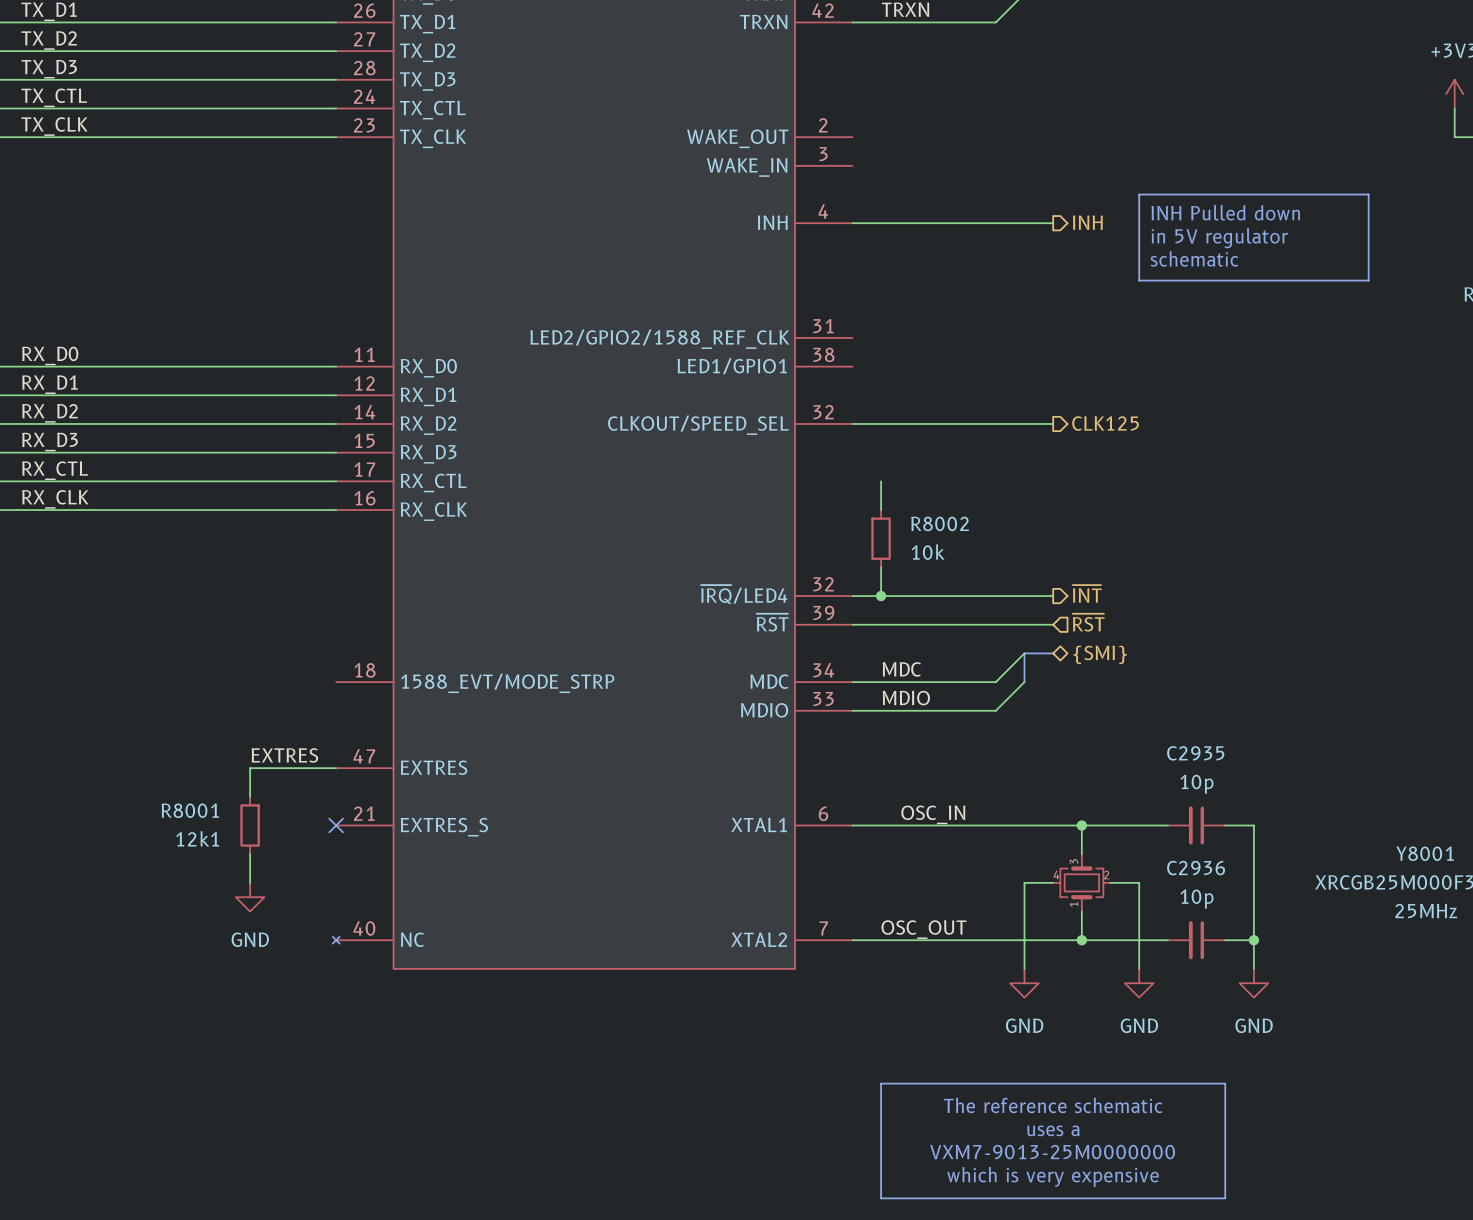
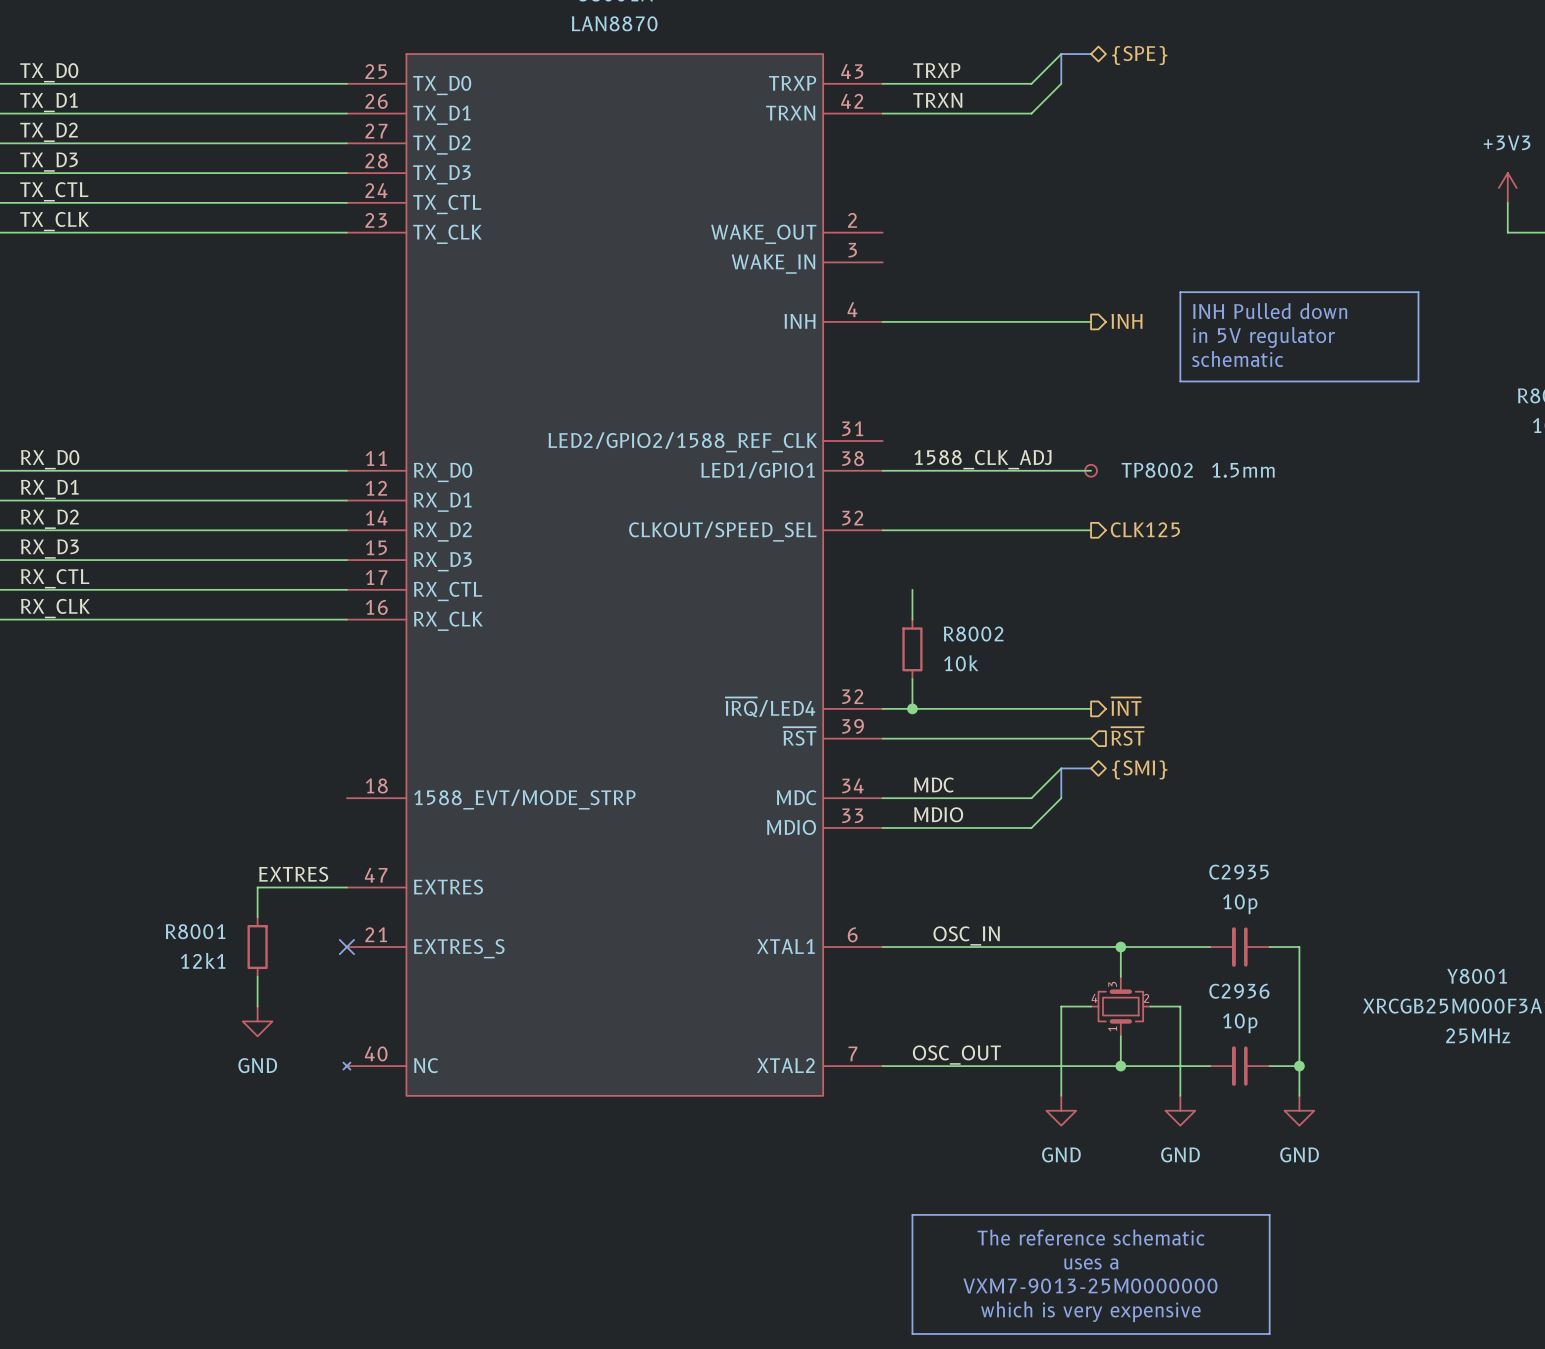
label: none -> 1588_CLK_ADJ (982, 459)
wire: none -> (882, 470) (1091, 470)
TP8002: none -> 1.5mm (1091, 470)

